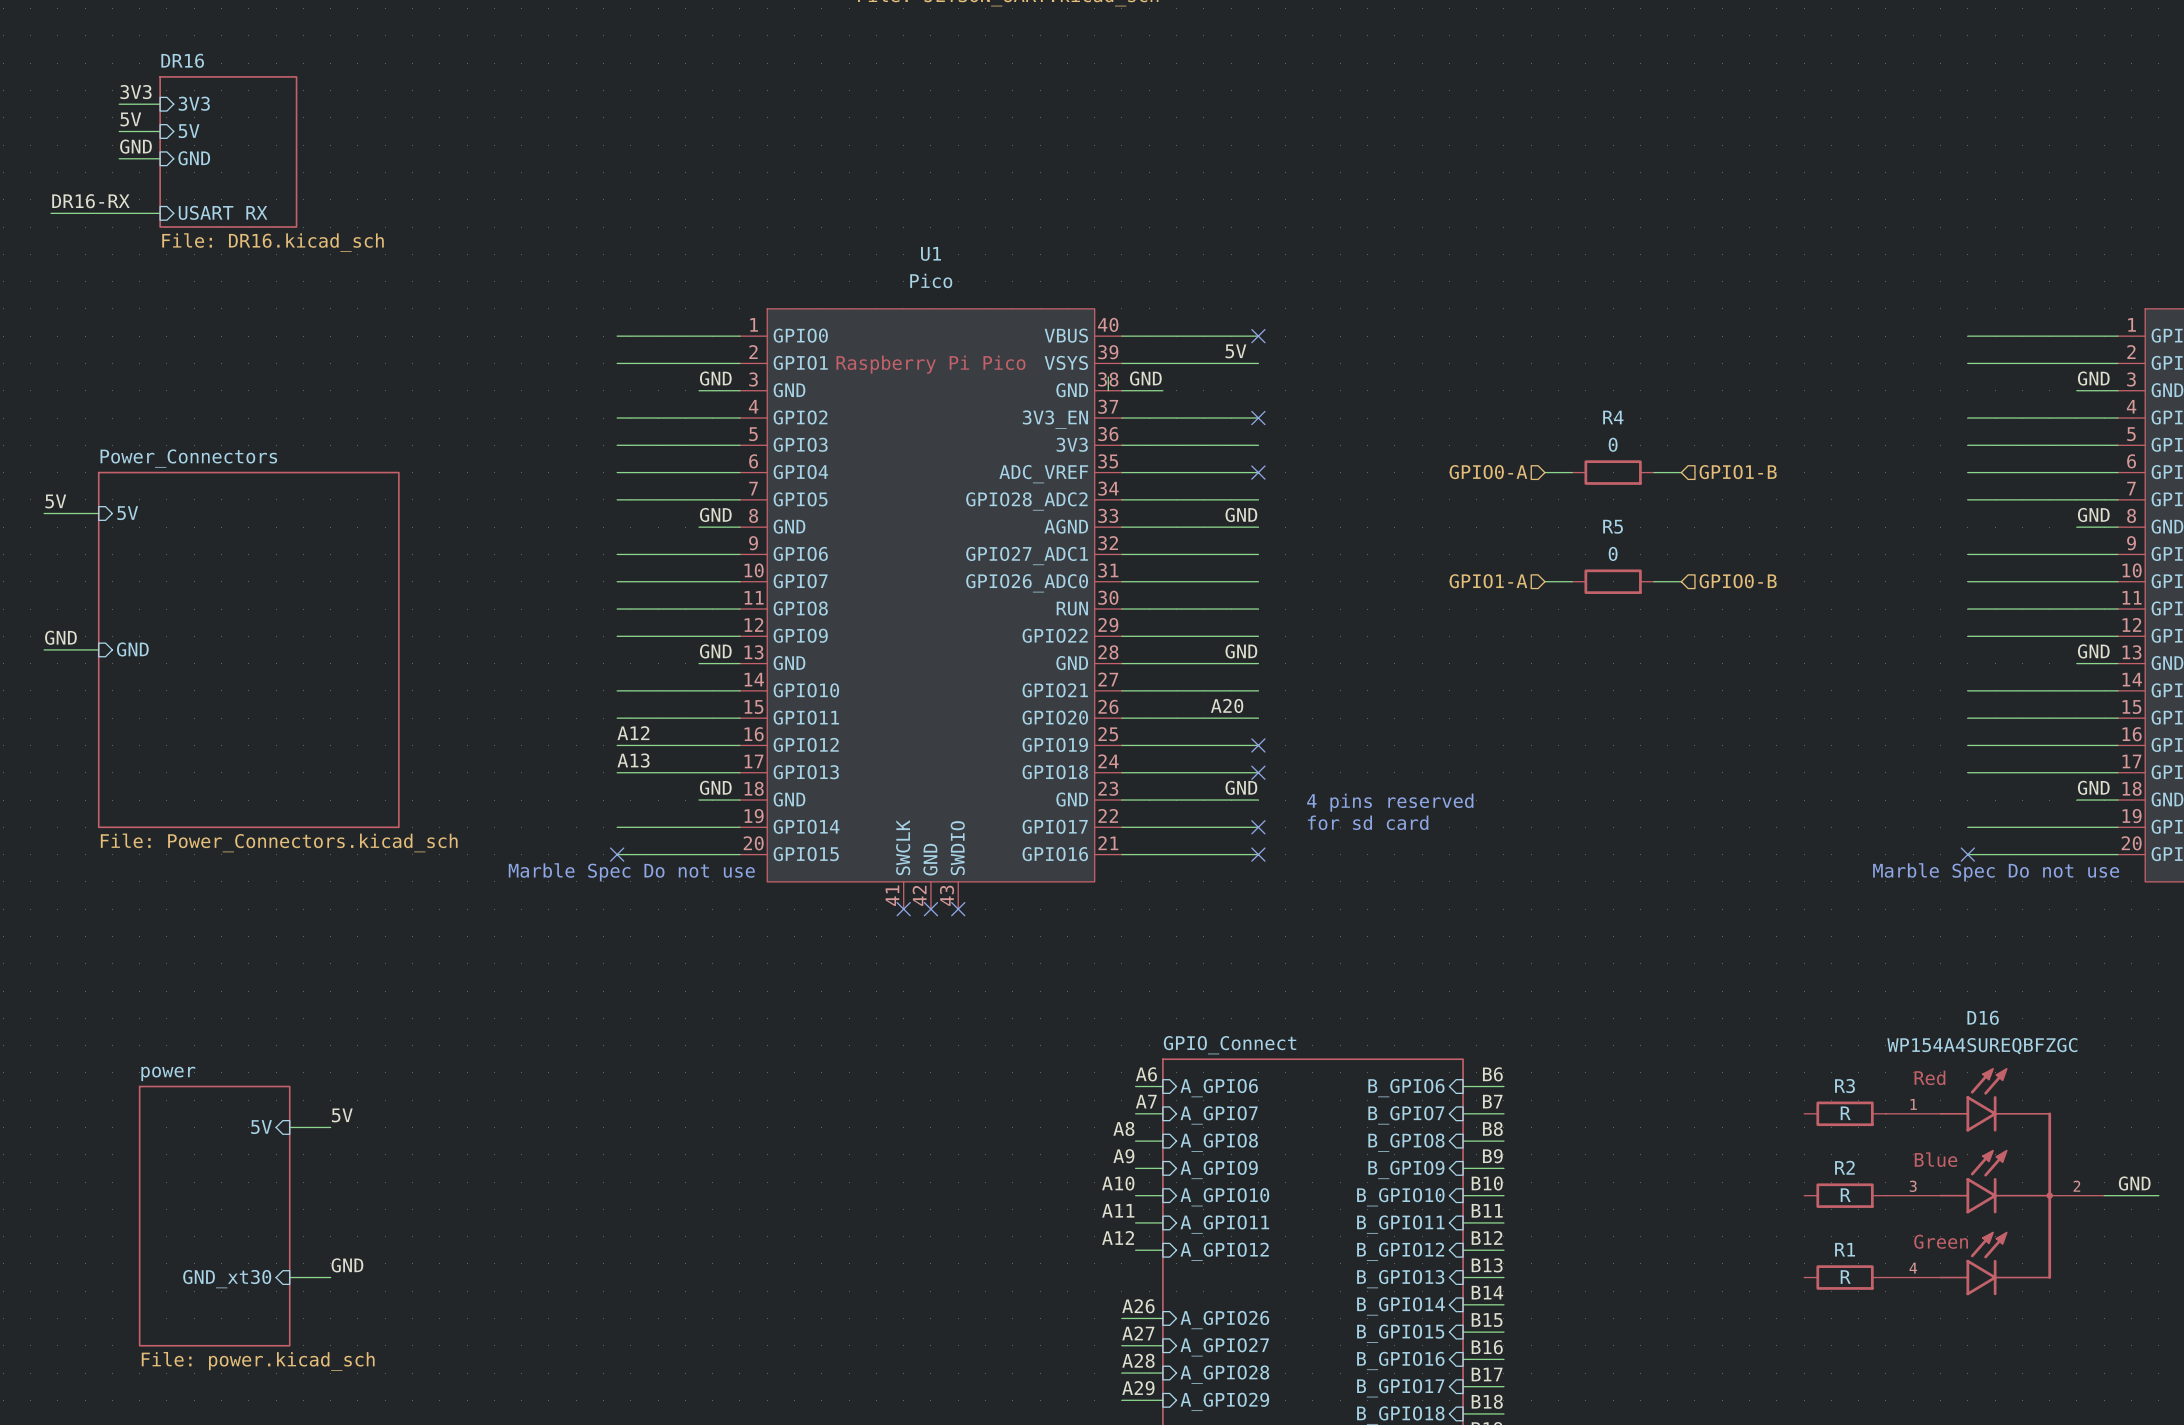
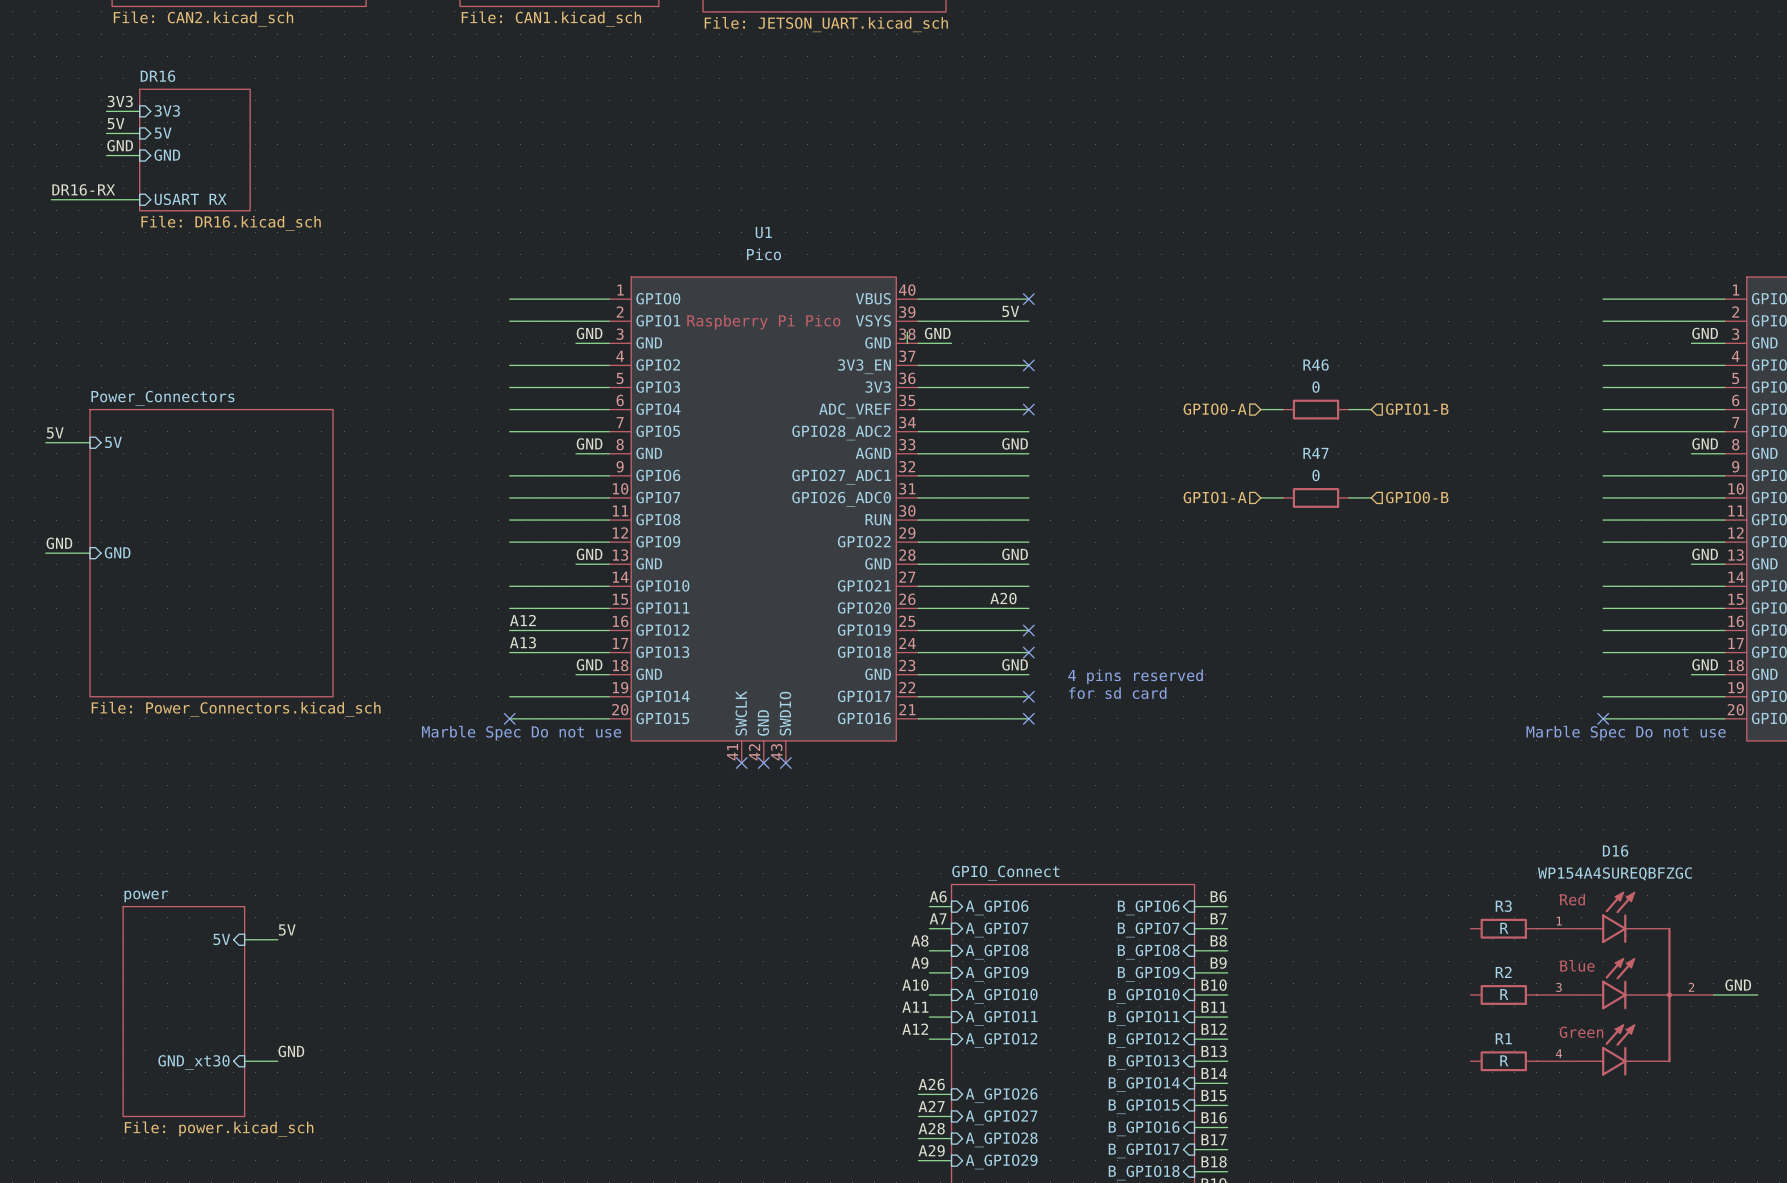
R4 name: R4 (1613, 417) -> R46 (1316, 365)
R5 name: R5 (1613, 526) -> R47 (1315, 453)

